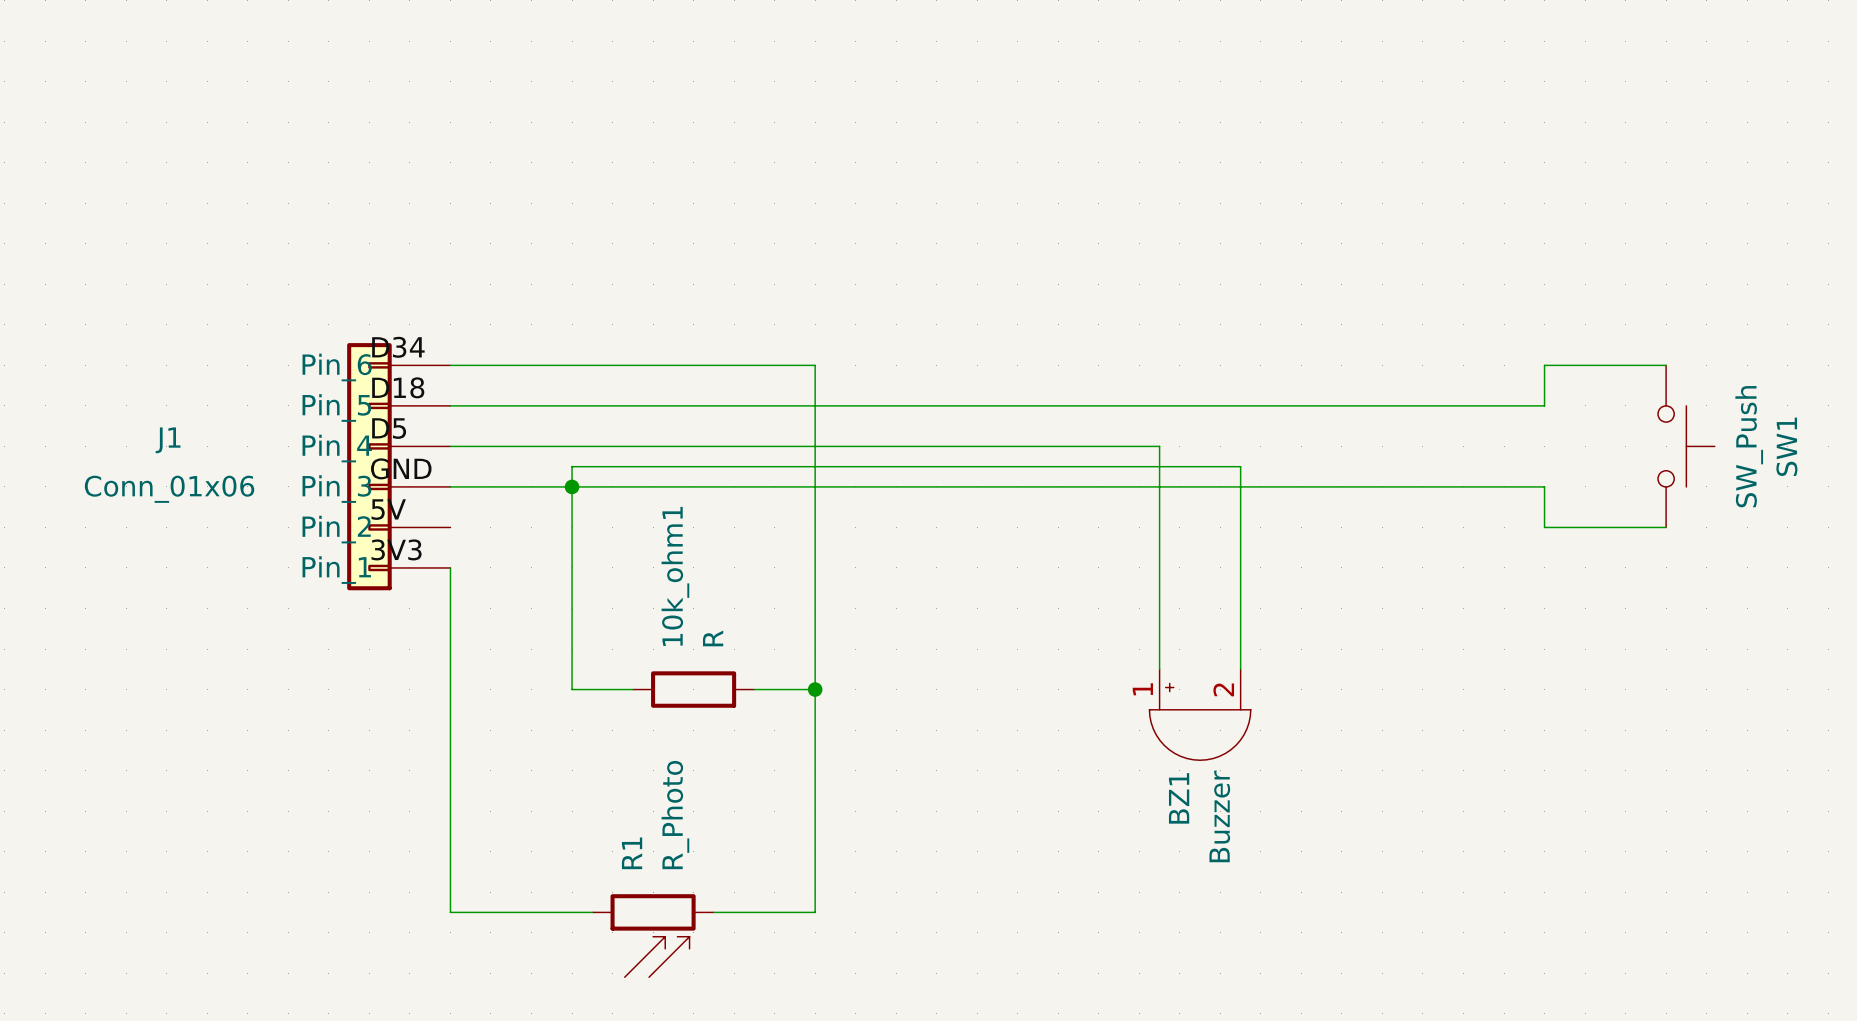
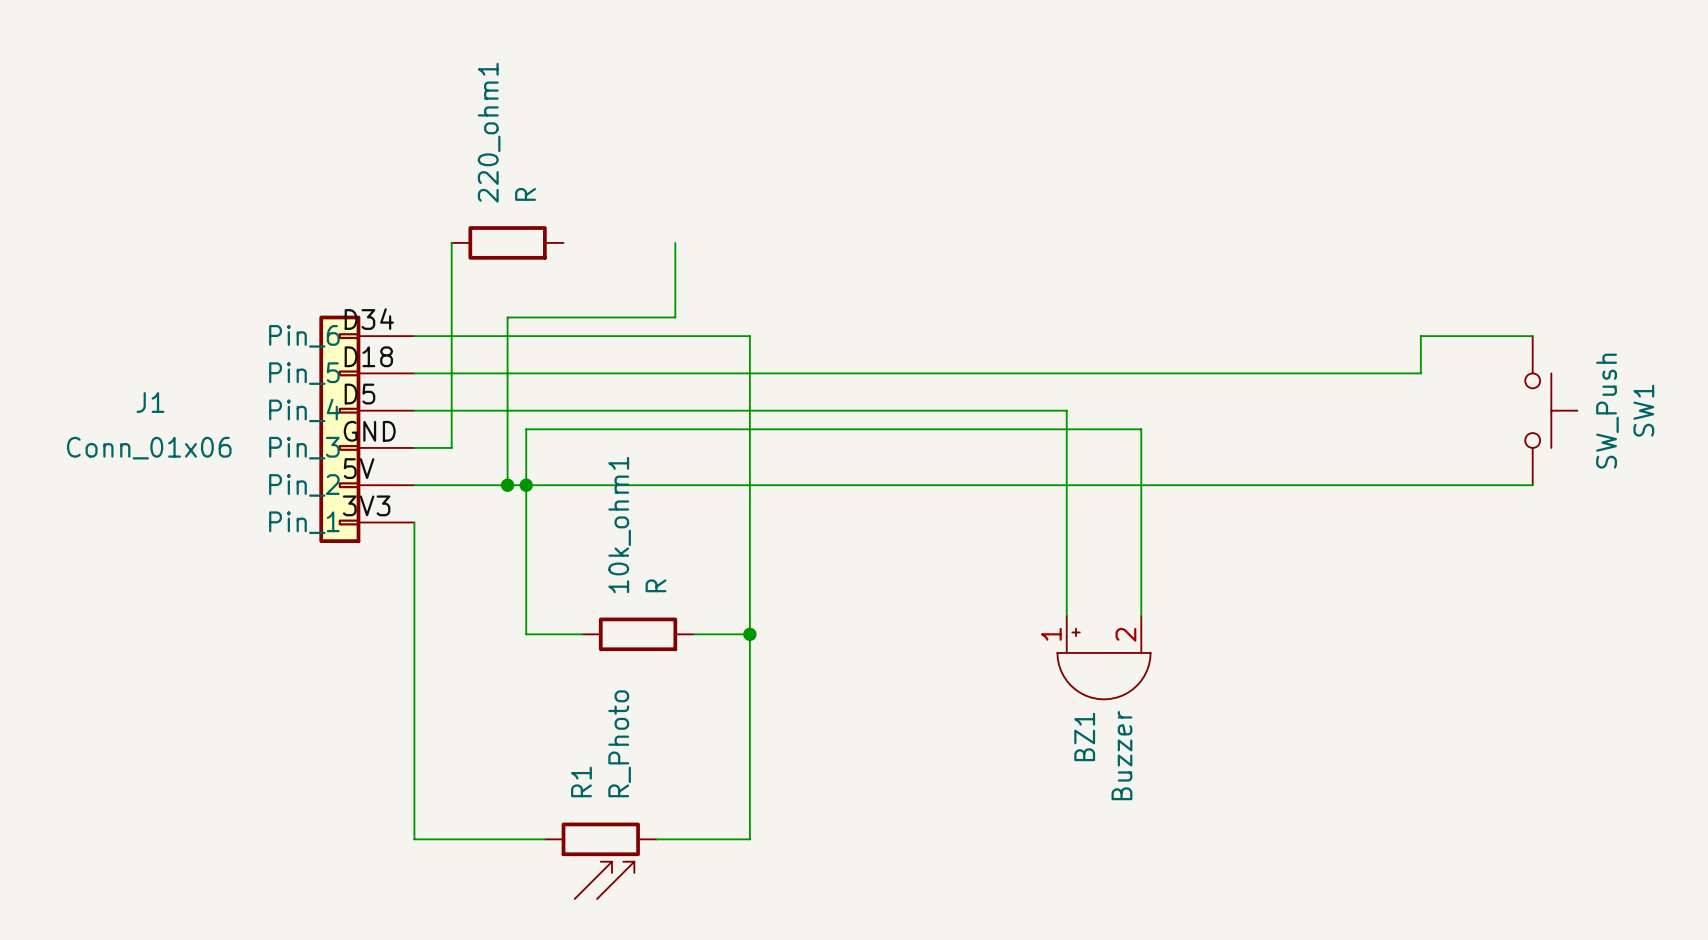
wire: none -> (451, 242) (451, 447)
220_ohm1: none -> R (507, 242)
wire: none -> (675, 242) (675, 317) (507, 317) (507, 485)
wire: (490, 486) (1544, 486) (1544, 527) -> (414, 485) (1420, 485)
junction: (572, 486) -> none
junction: none -> (507, 485)
junction: none -> (526, 485)

